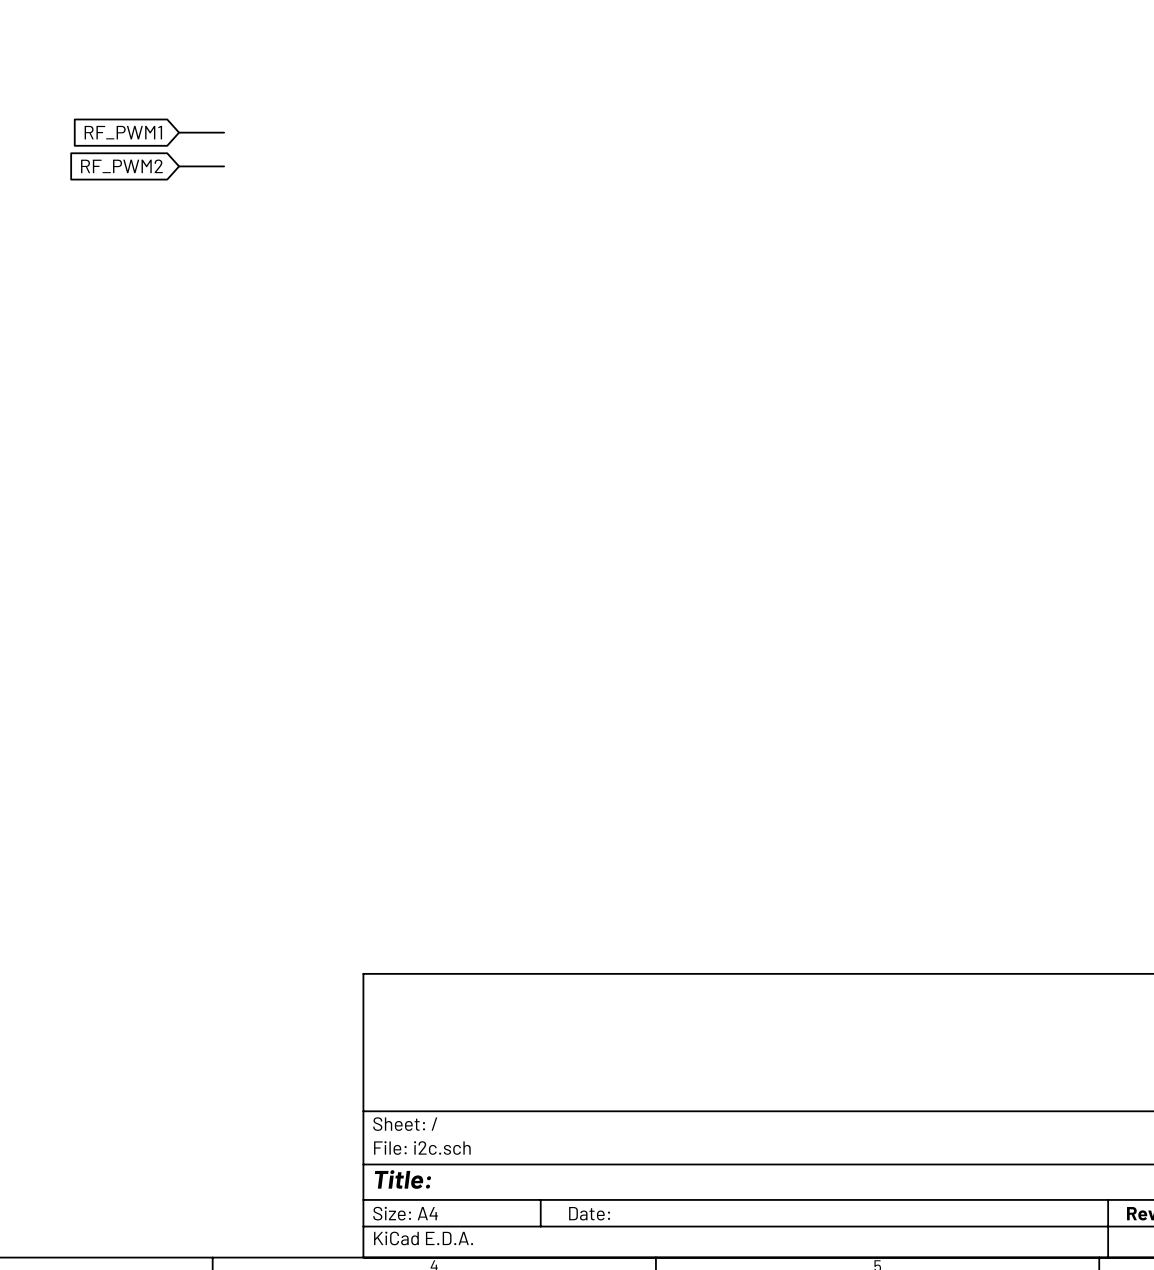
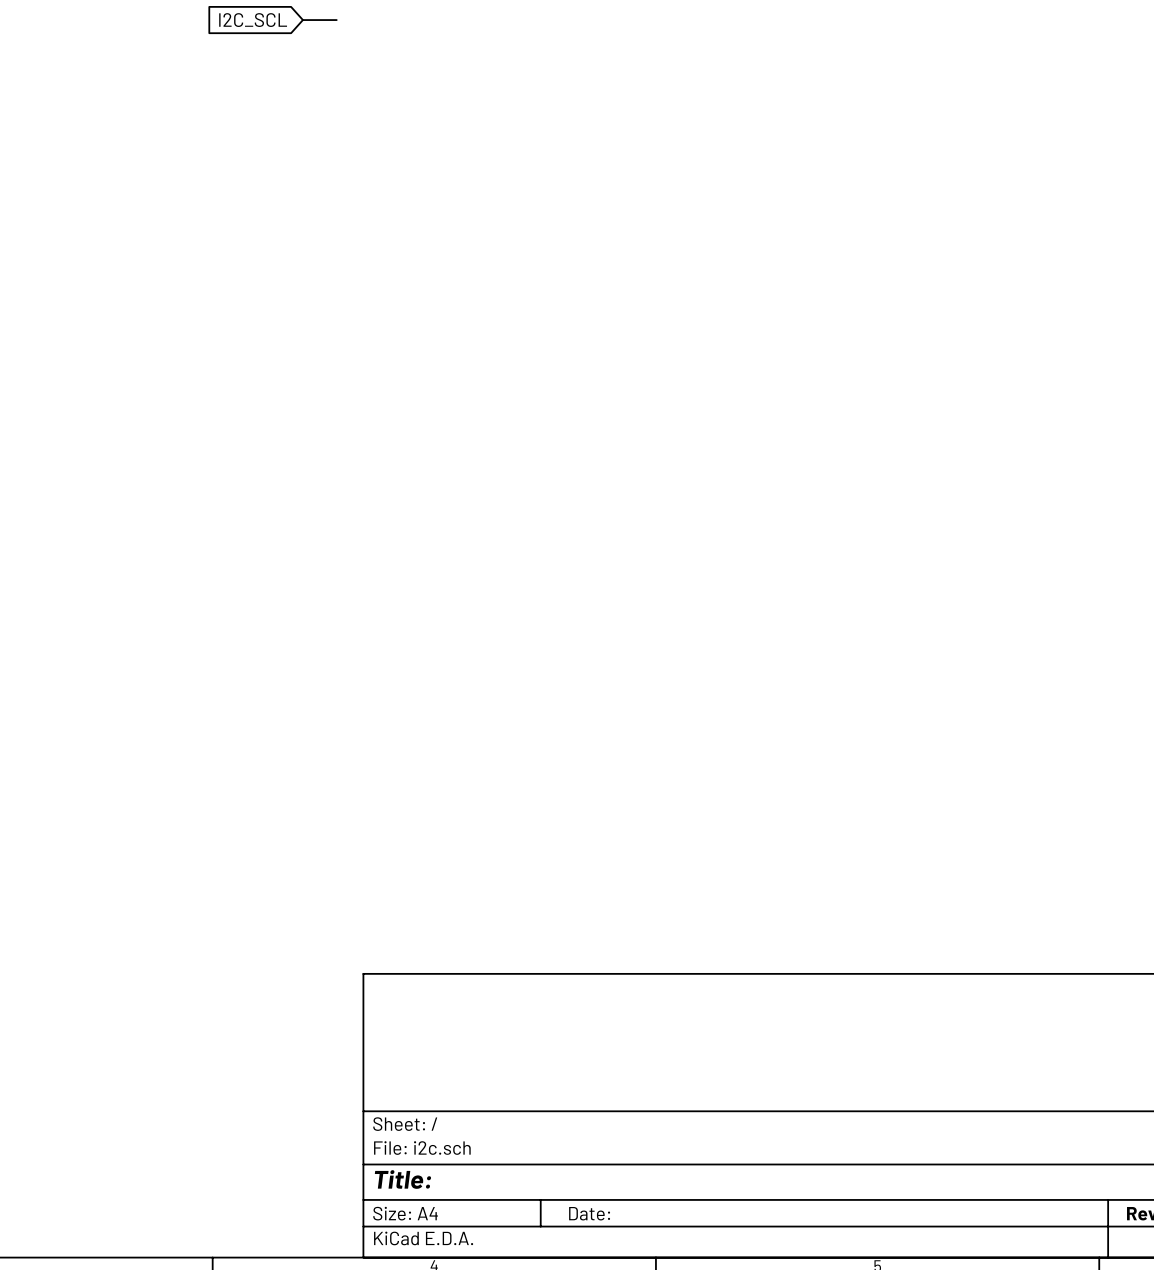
global label: none -> I2C_SCL (253, 20)
wire: none -> (302, 20) (336, 20)
global label: RF_PWM1 (123, 132) -> none
wire: (179, 132) (224, 132) -> none
global label: RF_PWM2 (121, 166) -> none
wire: (179, 166) (224, 166) -> none

